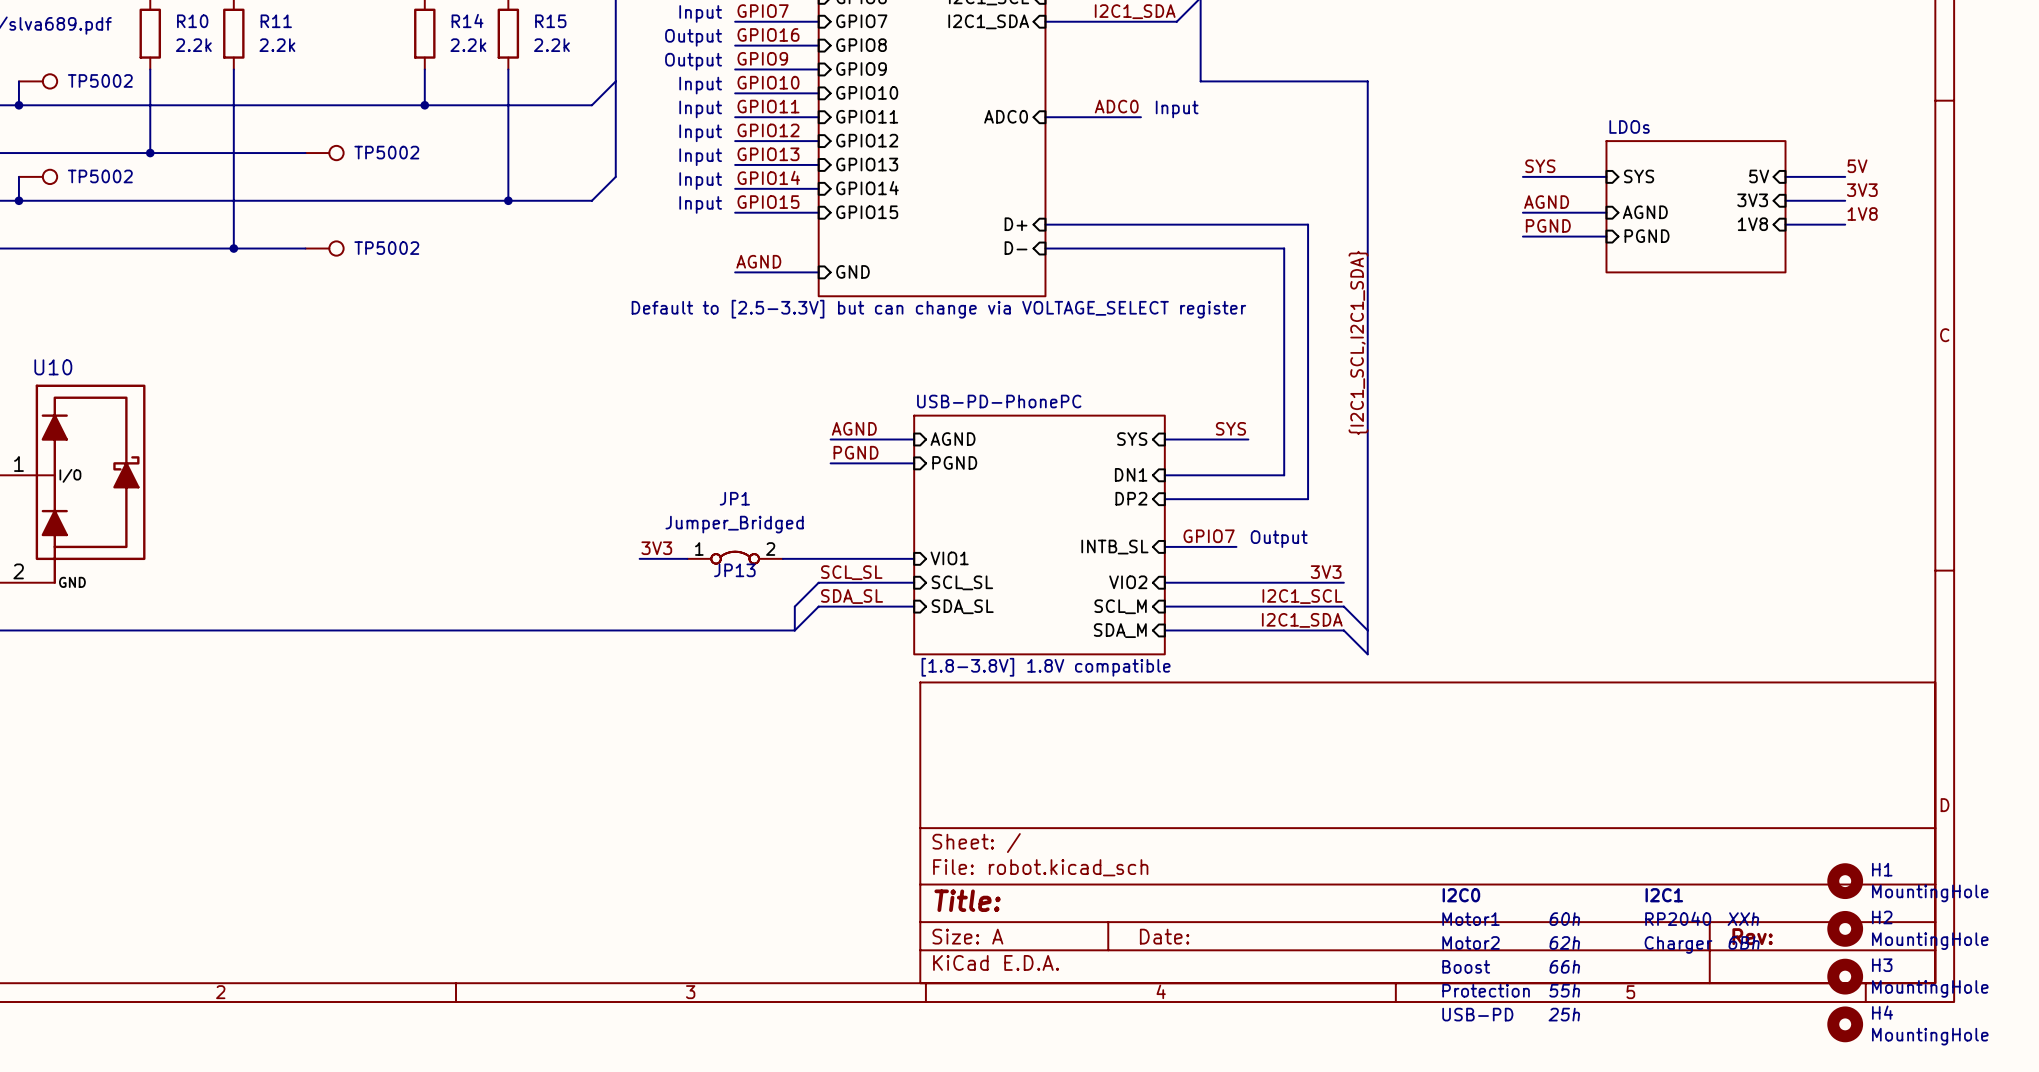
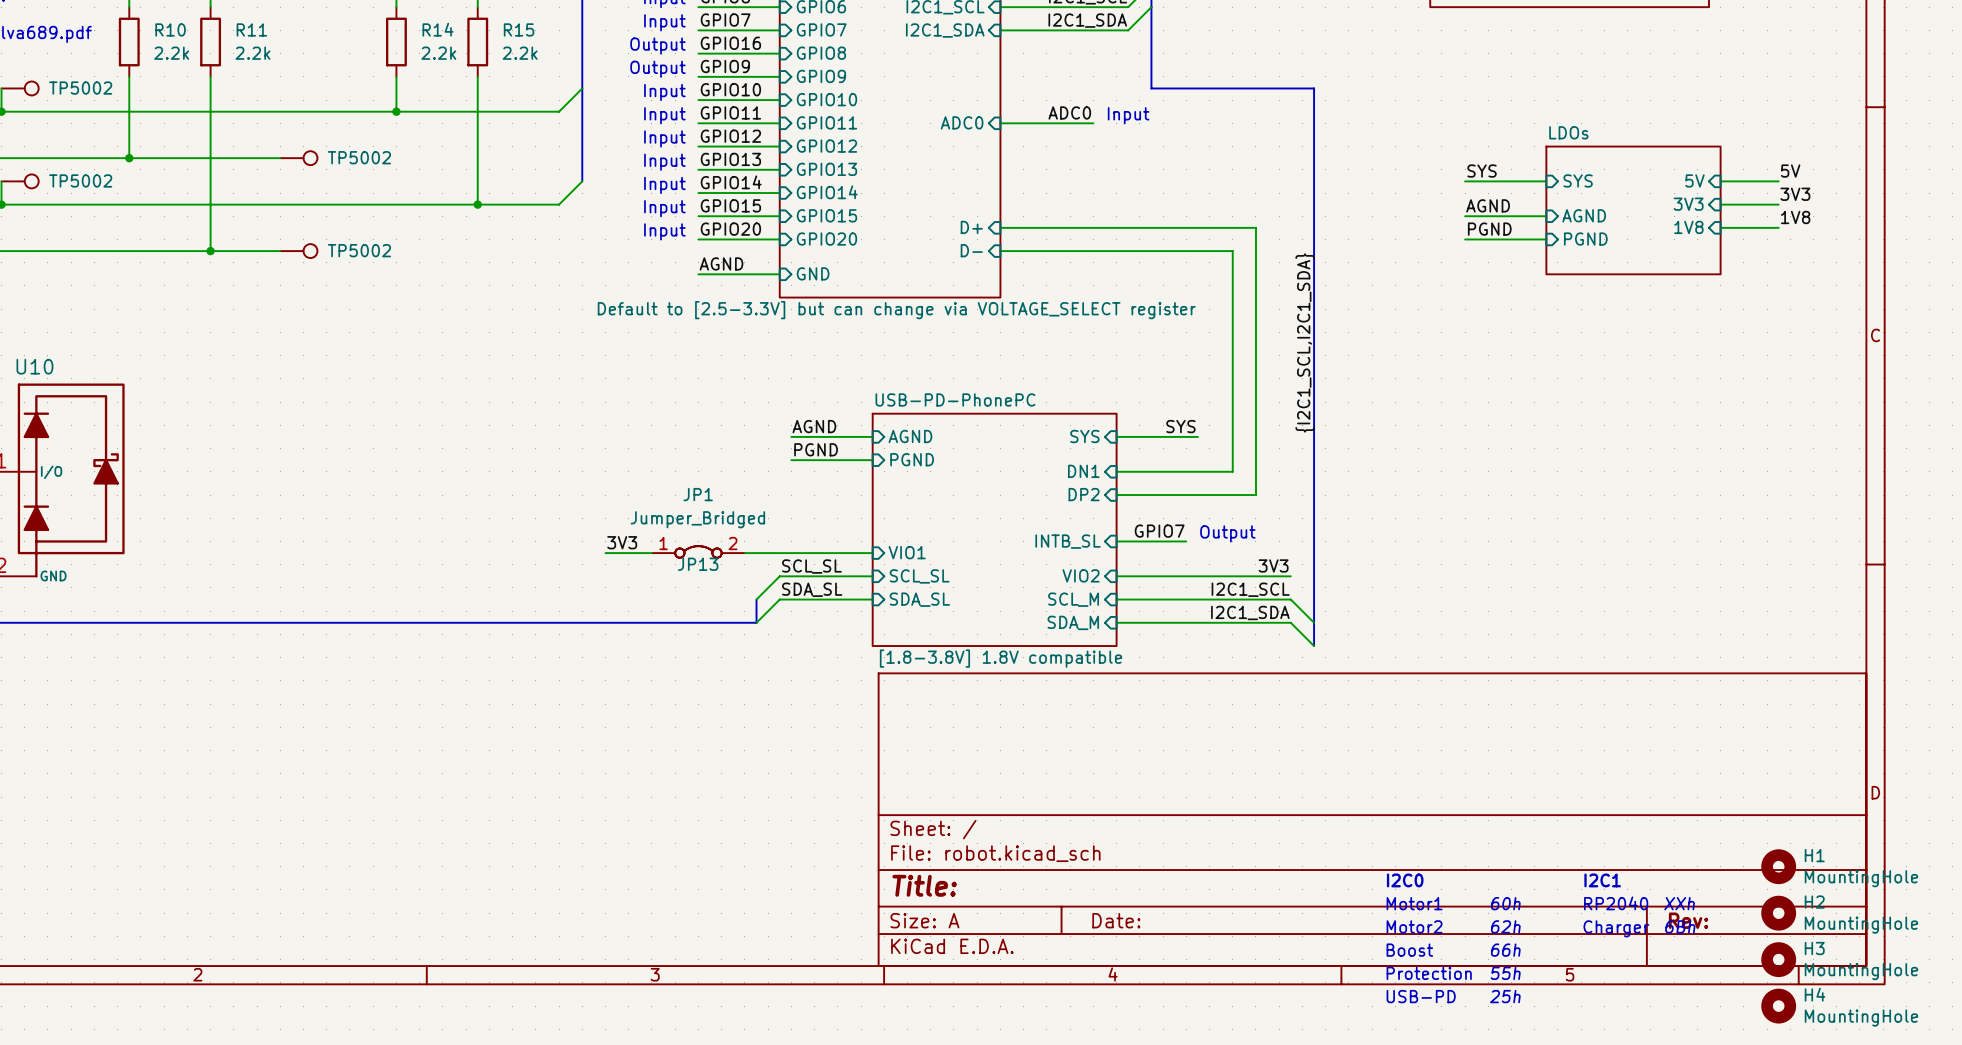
label: none -> GPIO20 (730, 229)
text: none -> Input (664, 231)
wire: none -> (698, 239) (779, 239)
sheet pin: none -> GPIO20 (826, 239)

